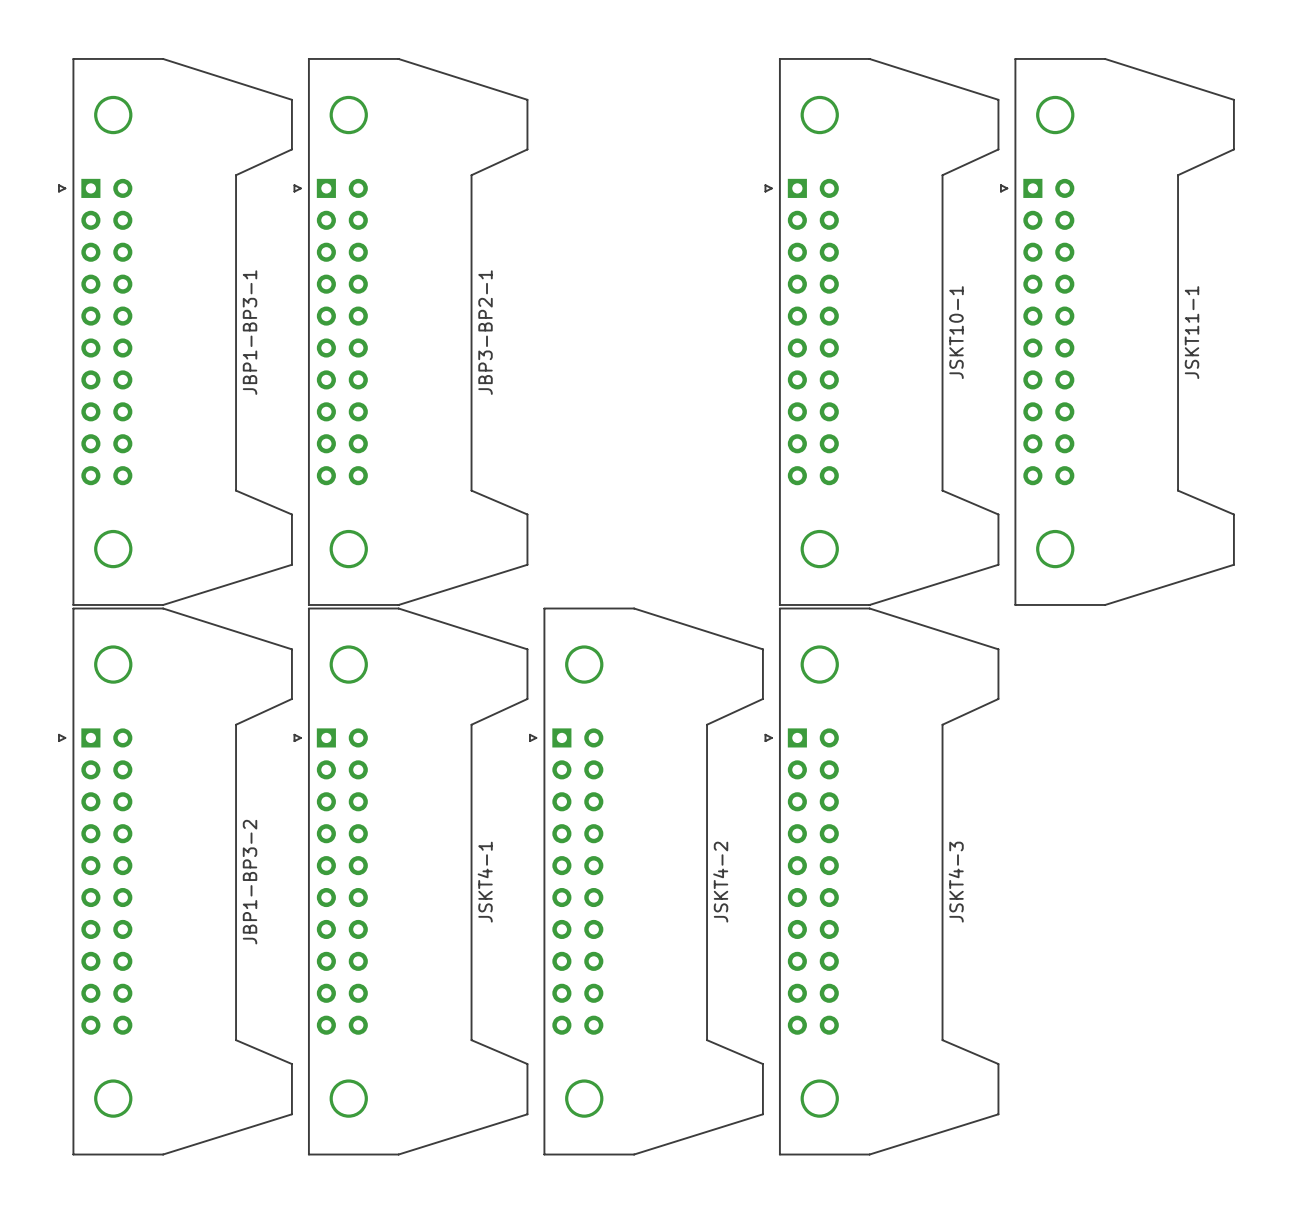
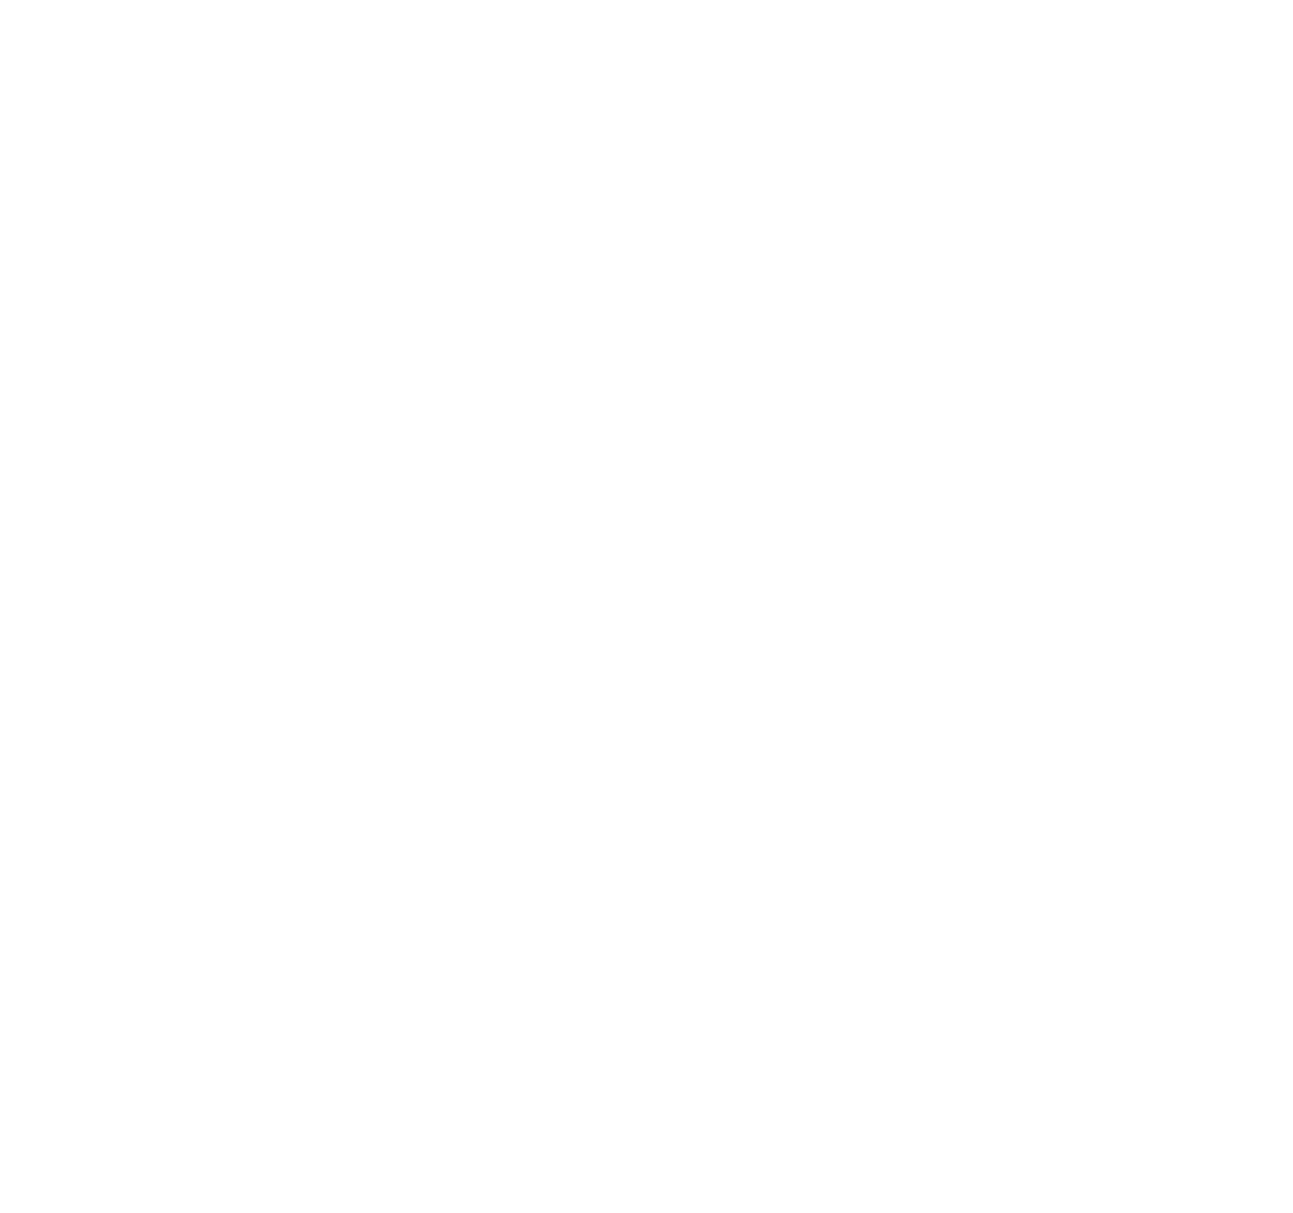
JBP1-BP3-1: (175, 331) -> none
JBP3-BP2-1: (410, 331) -> none
JSKT10-1: (881, 331) -> none
JSKT11-1: (1117, 331) -> none
JBP1-BP3-2: (175, 881) -> none
JSKT4-1: (410, 881) -> none
JSKT4-2: (646, 881) -> none
JSKT4-3: (881, 881) -> none

